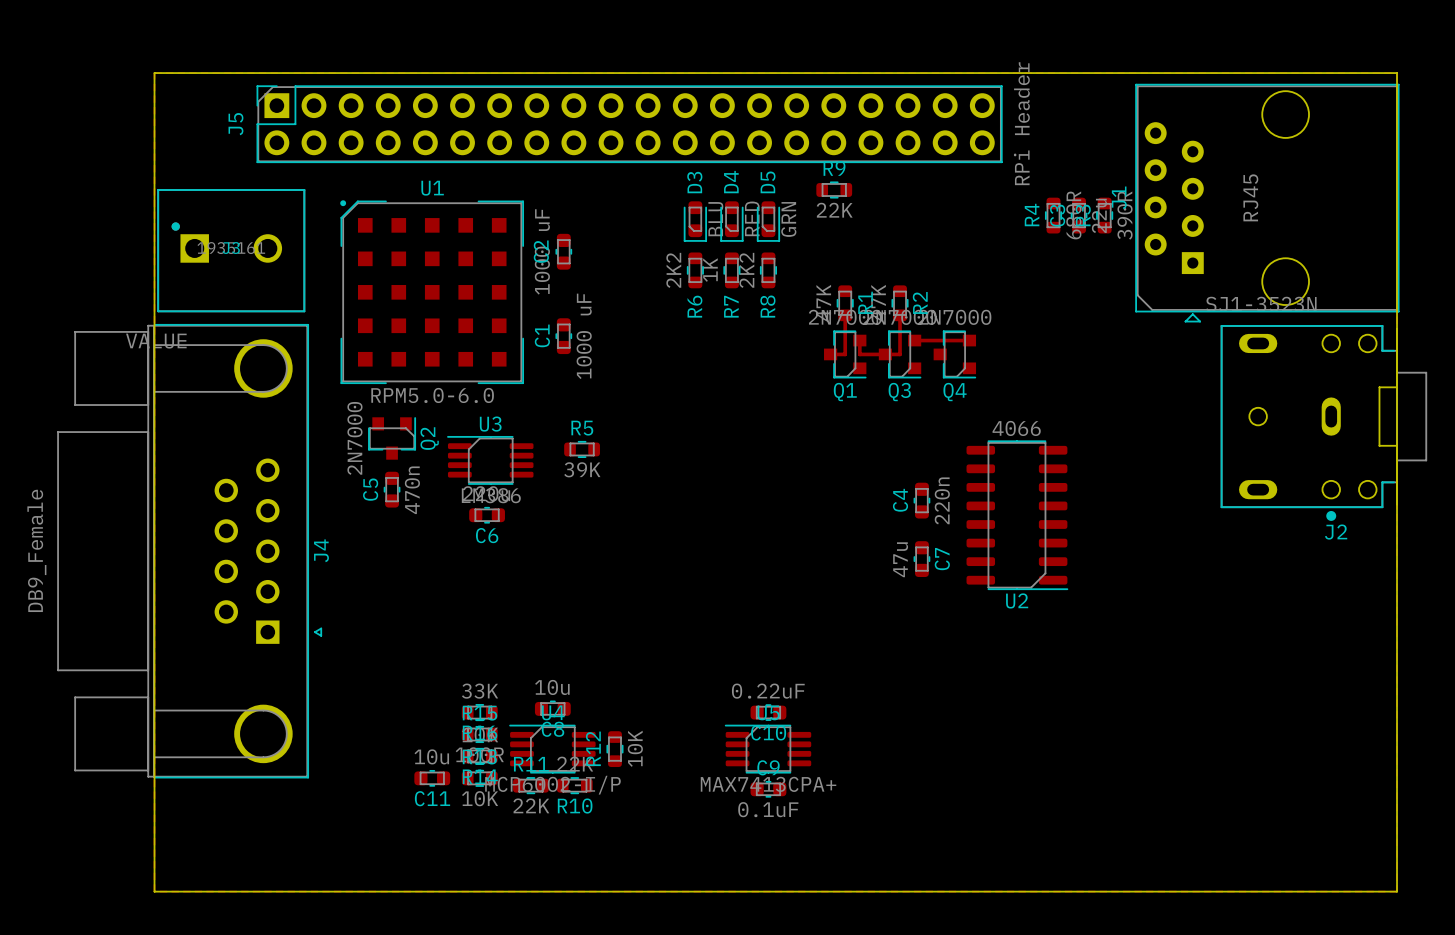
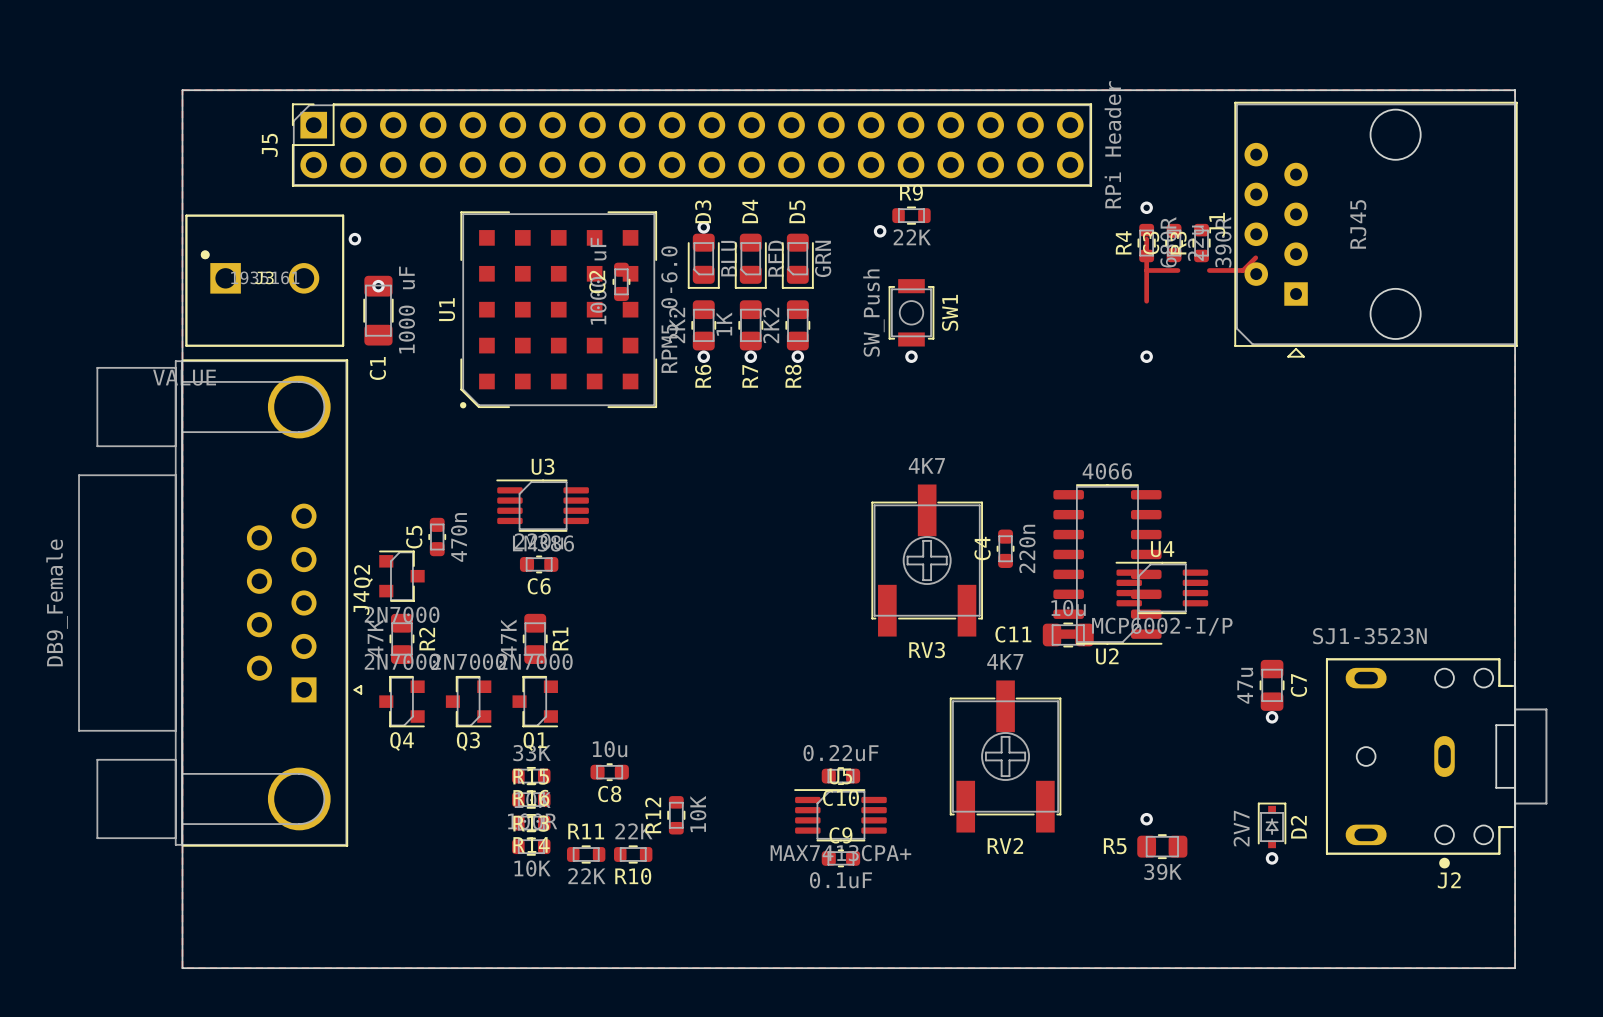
via: none -> (1146, 207)
via: none -> (703, 227)
D3 footprint: [683, 201, 707, 242] -> [687, 233, 720, 289]
D4 footprint: [720, 201, 744, 242] -> [734, 233, 767, 289]
D5 footprint: [756, 201, 781, 242] -> [781, 233, 814, 289]
via: none -> (880, 231)
via: none -> (354, 239)
track: none -> (1146, 239) (1146, 301)
track: none -> (1255, 257) (1243, 270) (1209, 270)
track: none -> (1146, 270) (1178, 270)
R6 footprint: [686, 252, 704, 289] -> [691, 300, 717, 351]
R7 footprint: [723, 252, 741, 289] -> [738, 300, 764, 351]
R8 footprint: [759, 252, 777, 289] -> [785, 300, 811, 351]
via: none -> (378, 286)
SW1: none -> SW_Push (911, 312)
R1 footprint: [836, 285, 854, 322] -> [522, 613, 548, 665]
R2 footprint: [891, 285, 909, 322] -> [389, 613, 415, 665]
U1 rotation: 0° (432, 292) -> 90° counterclockwise (558, 309)
track: (845, 315) (845, 354) (830, 354) -> none
track: (900, 315) (900, 354) (859, 354) (859, 340) -> none
C1 footprint: [555, 318, 573, 355] -> [363, 275, 394, 346]
via: none -> (703, 356)
via: none -> (750, 356)
via: none -> (797, 356)
via: none -> (911, 356)
via: none -> (1146, 356)
C1 name position: C1 (542, 335) -> C1 (377, 368)
track: (914, 340) (969, 340) -> none
Q1 position: (845, 354) -> (535, 701)
Q3 position: (900, 354) -> (468, 701)
Q4 position: (954, 354) -> (402, 701)
J2 position: (1323, 422) -> (1436, 763)
R5 name position: R5 (582, 428) -> R5 (1115, 846)
Q2 rotation: 0° (392, 438) -> 90° counterclockwise (401, 576)
Q2 position: (392, 438) -> (401, 576)
Q2 name position: Q2 (429, 438) -> Q2 (363, 576)
R5 footprint: [564, 440, 600, 458] -> [1137, 834, 1188, 860]
RV3: none -> 4K7 (927, 560)
C7 footprint: [913, 541, 931, 577] -> [1259, 659, 1285, 711]
via: none -> (1272, 717)
RV2: none -> 4K7 (1005, 756)
U4 position: (552, 749) -> (1161, 587)
via: none -> (1146, 819)
D2: none -> 2V7 (1272, 825)
C11 footprint: [414, 770, 451, 787] -> [1042, 622, 1094, 648]
via: none -> (1272, 858)
C11 name position: C11 (432, 798) -> C11 (1013, 634)

